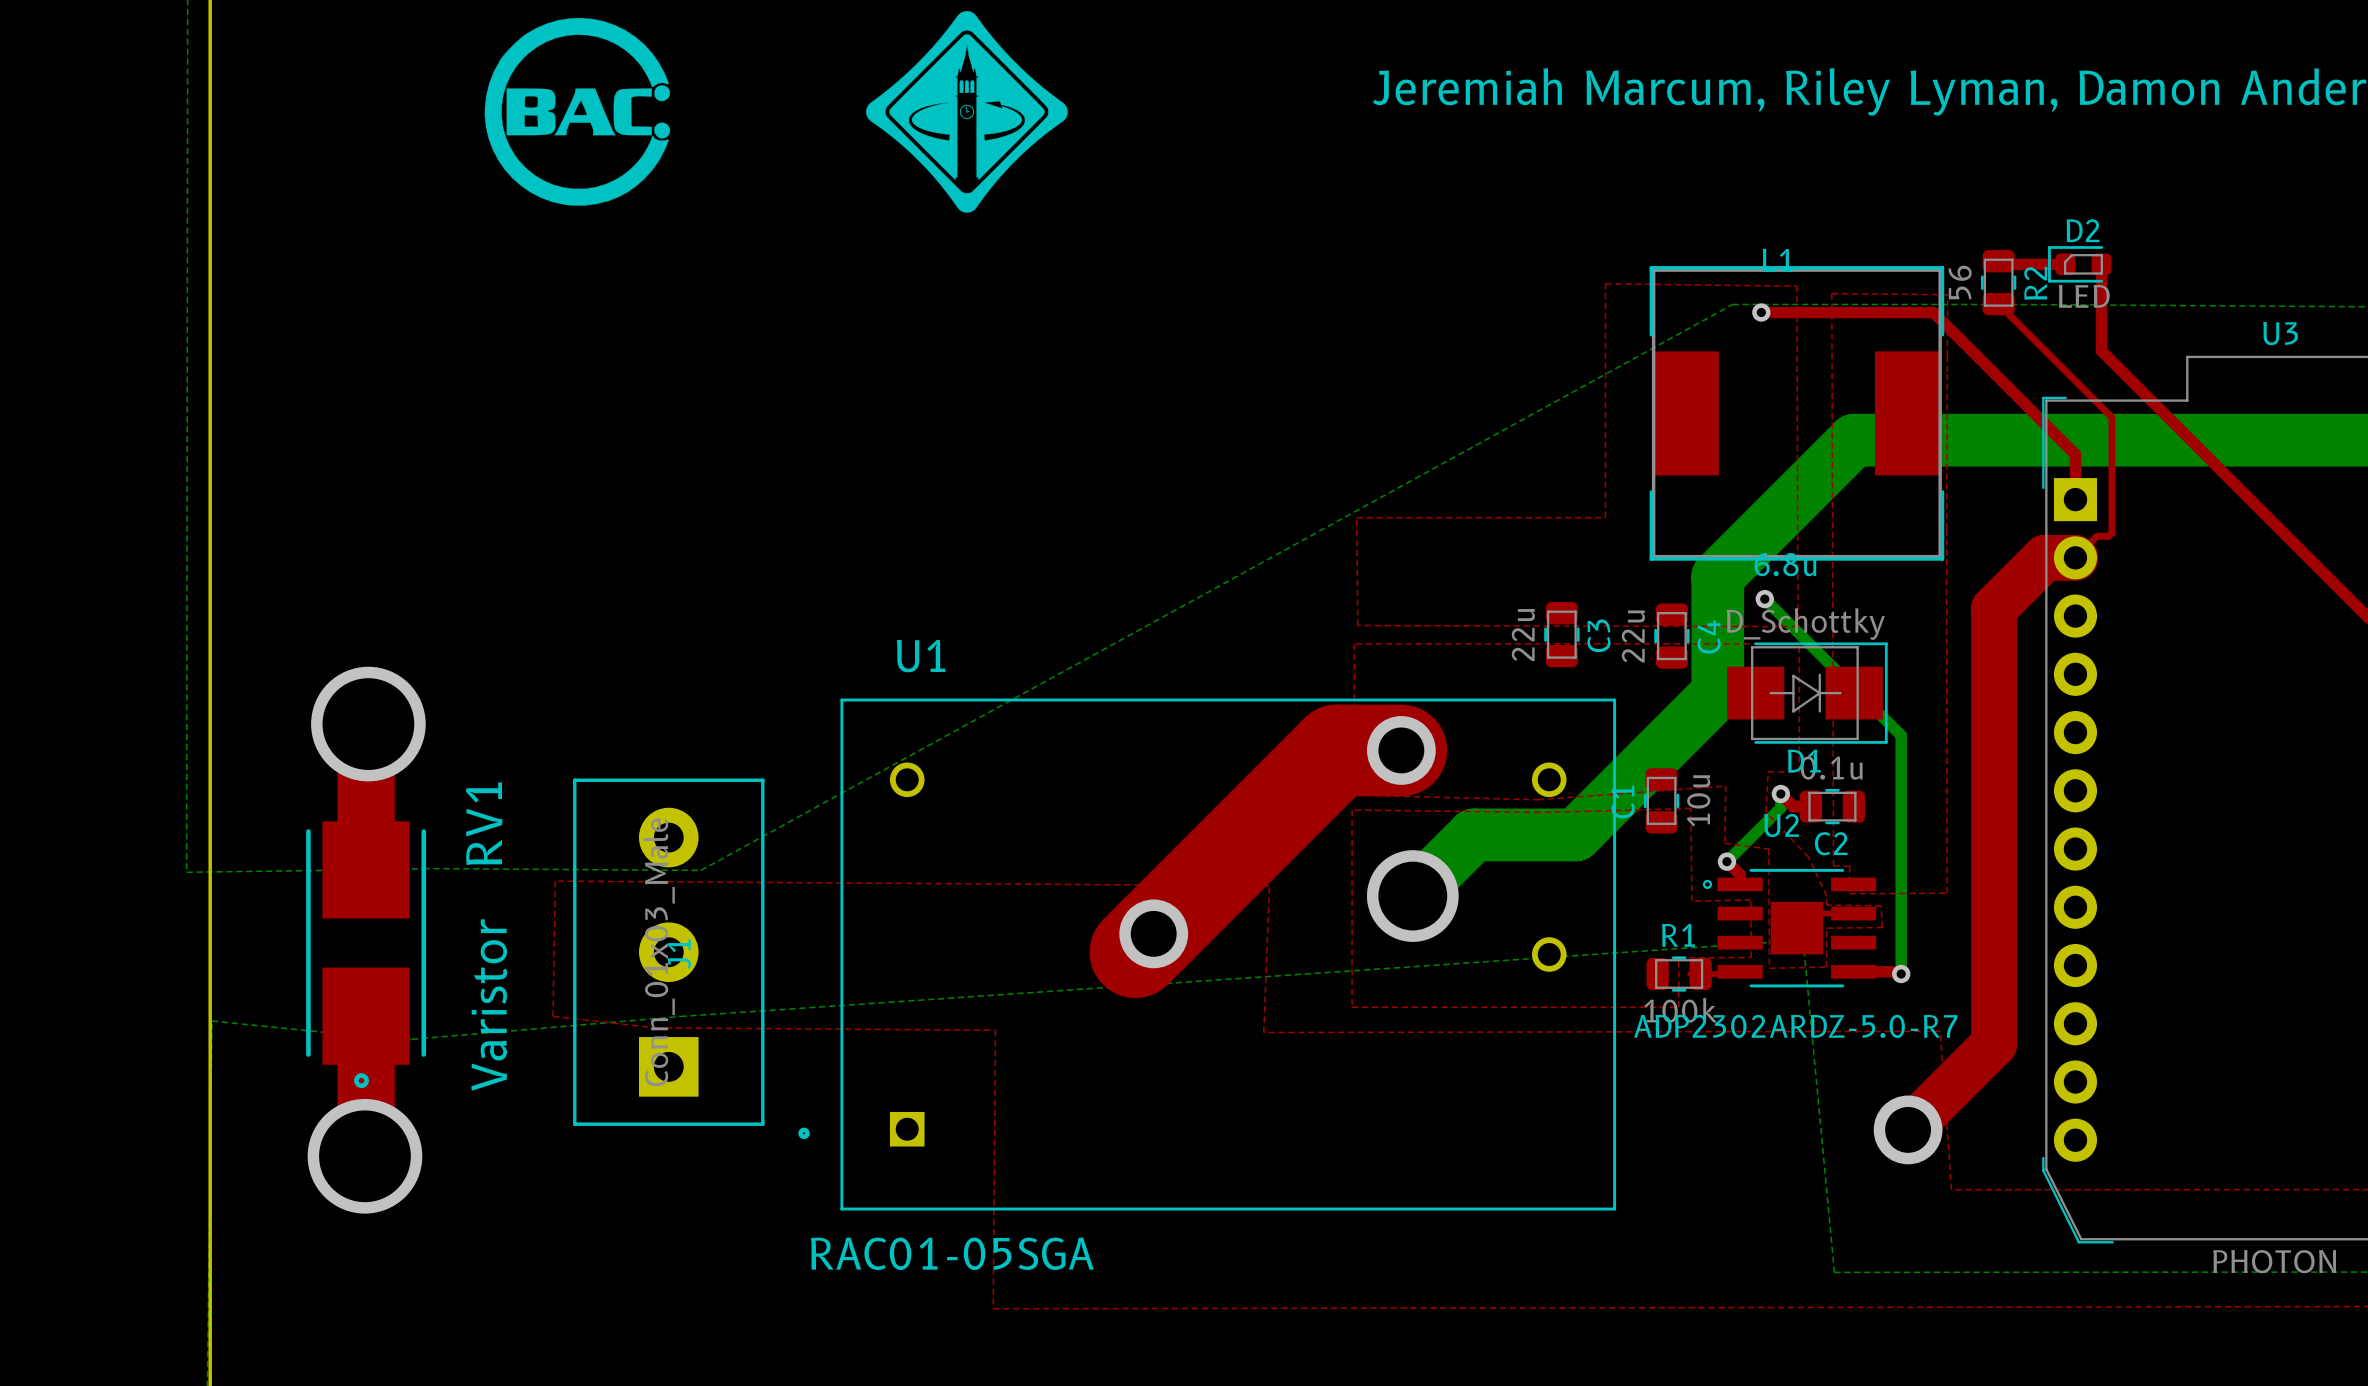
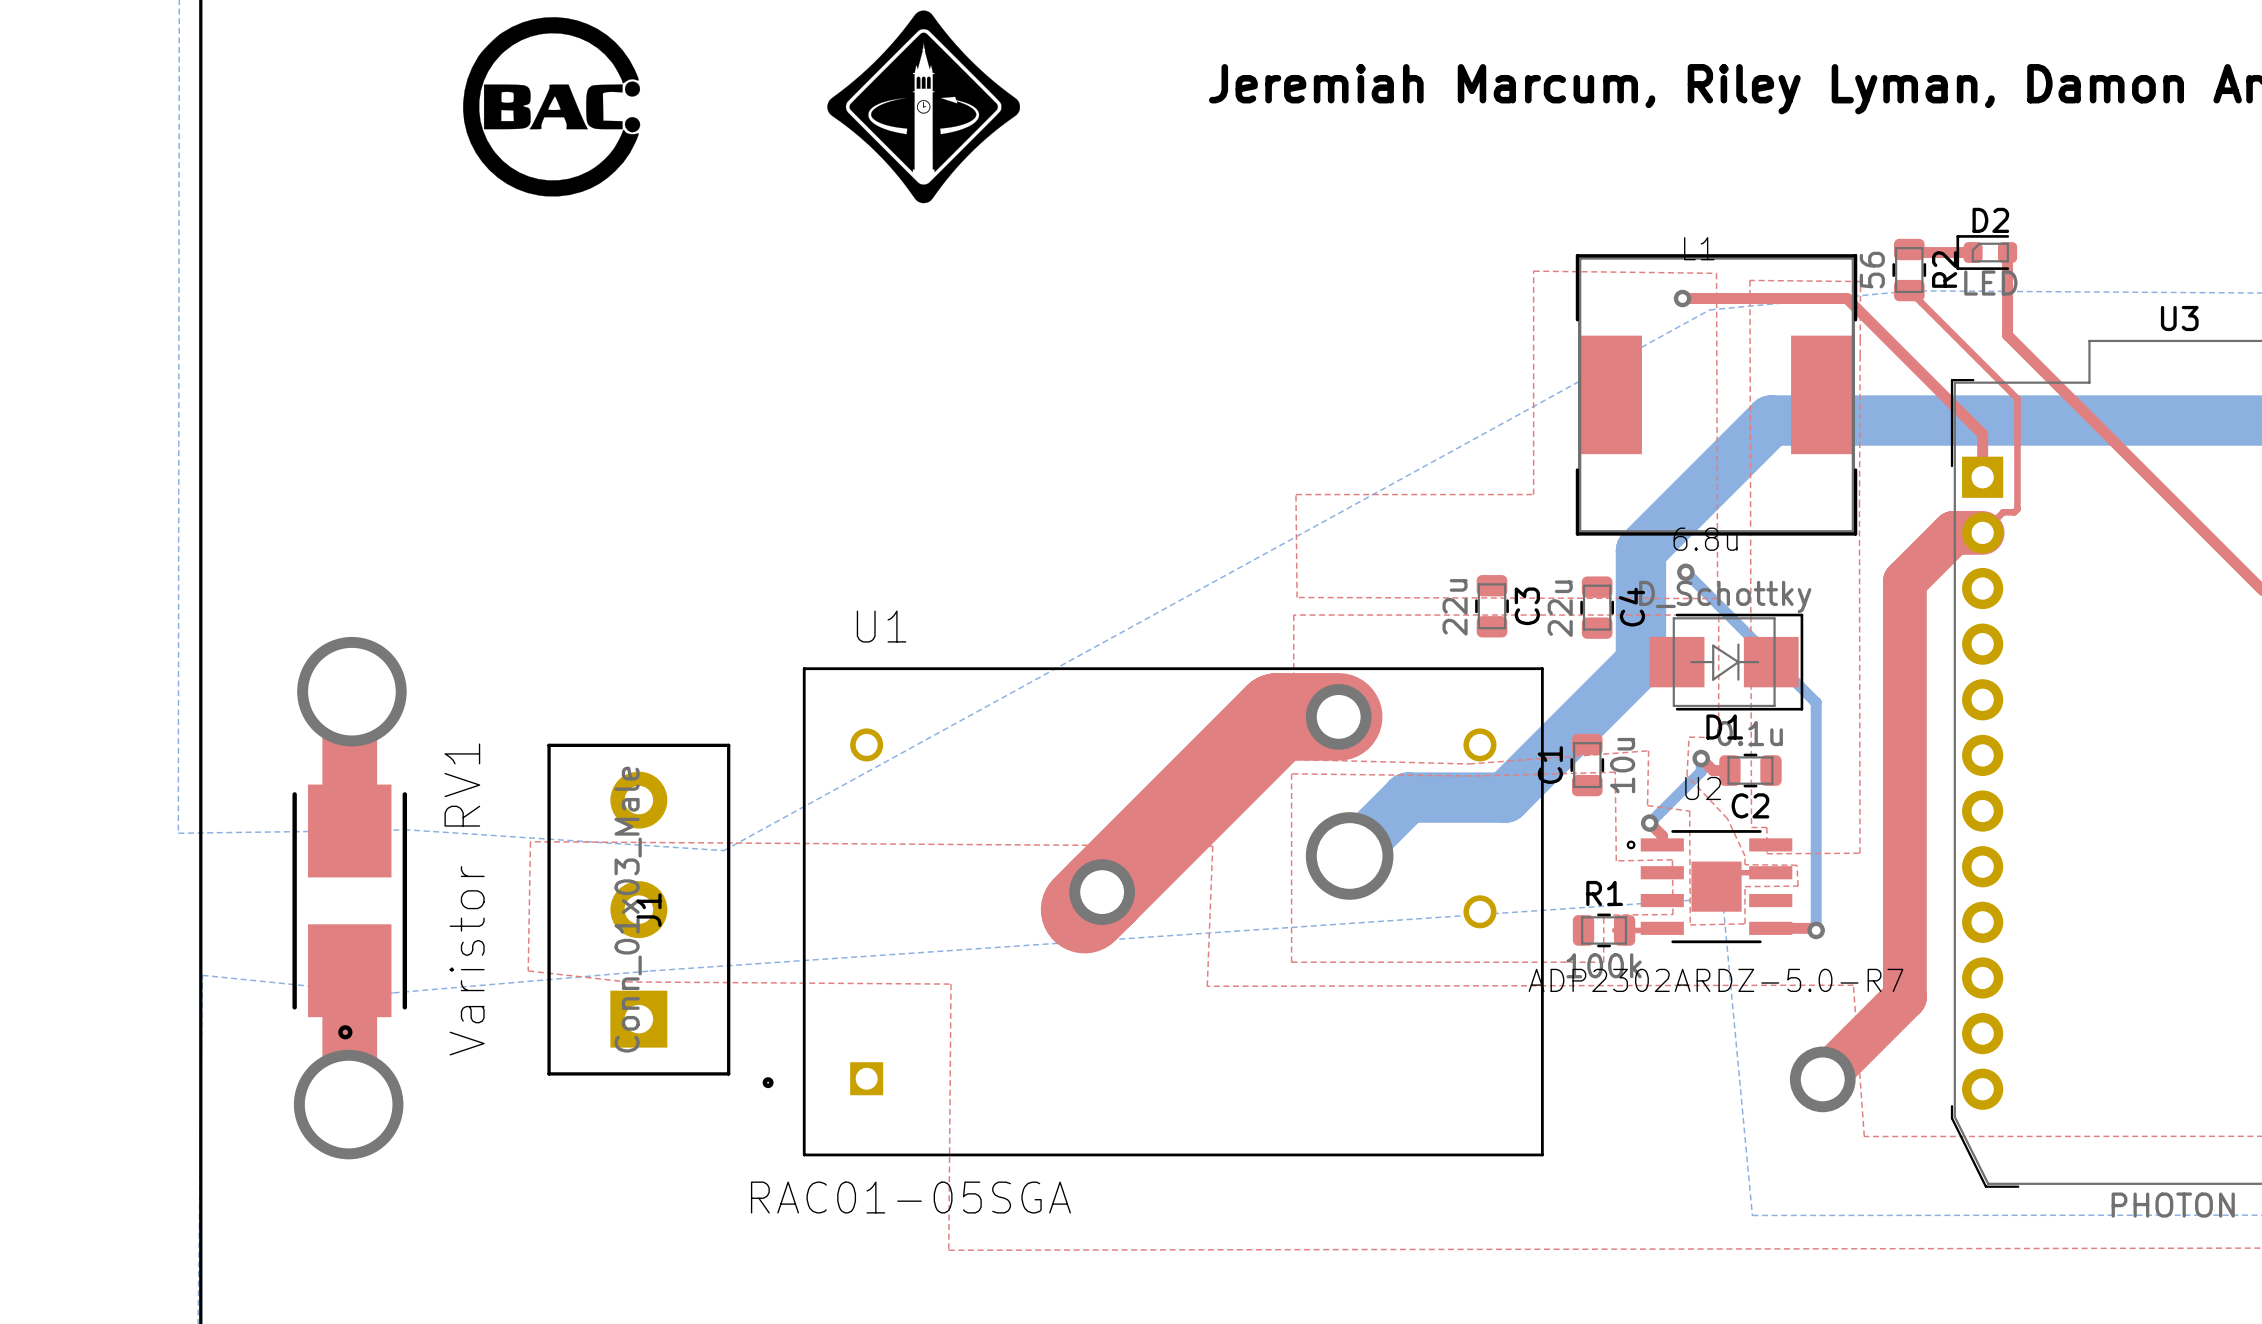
bottom zone outline: (2000, 304) (1732, 304) (700, 870) (423, 868) -> (1911, 290) (1709, 309) (723, 850) (404, 829)

